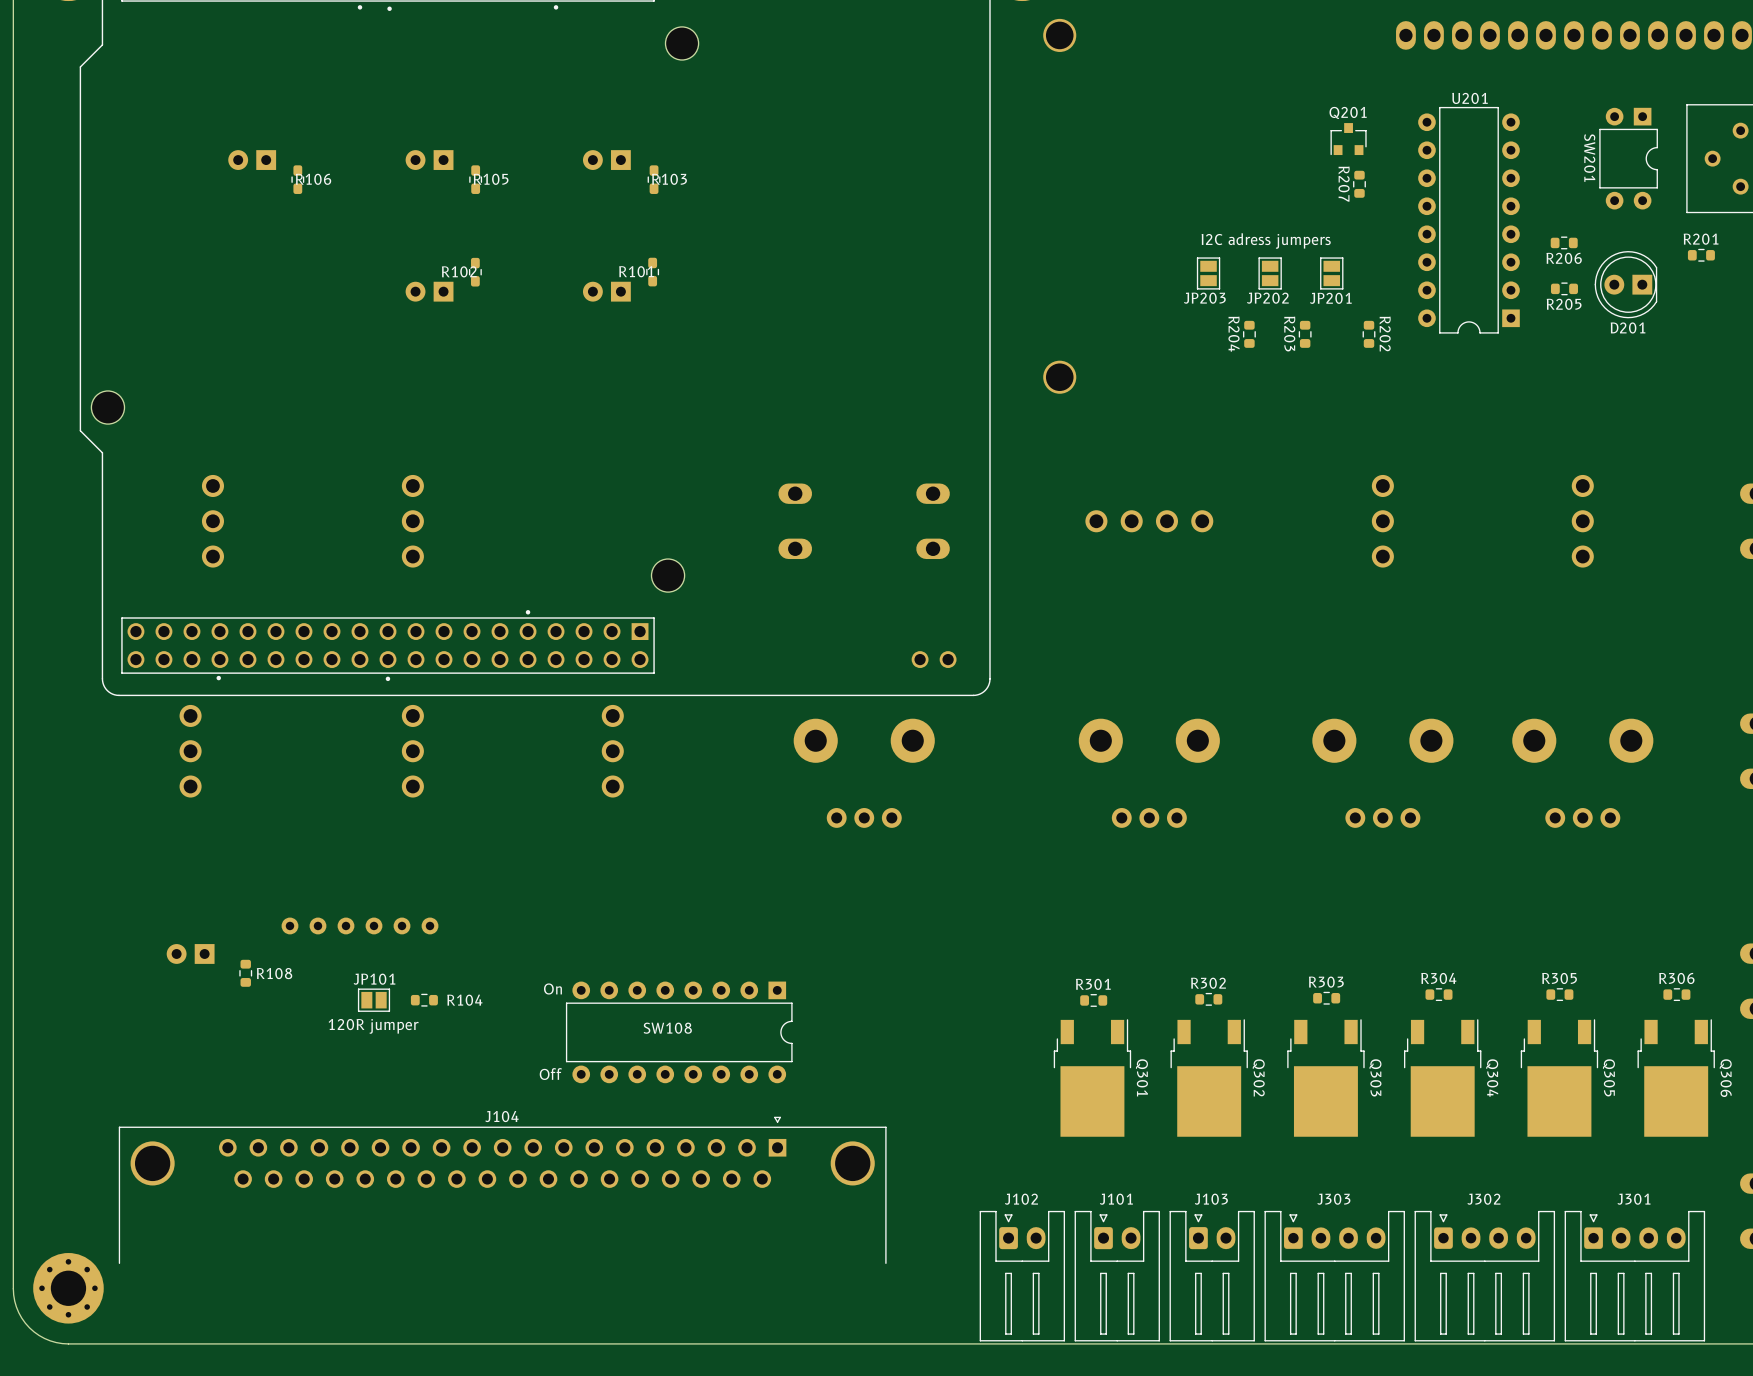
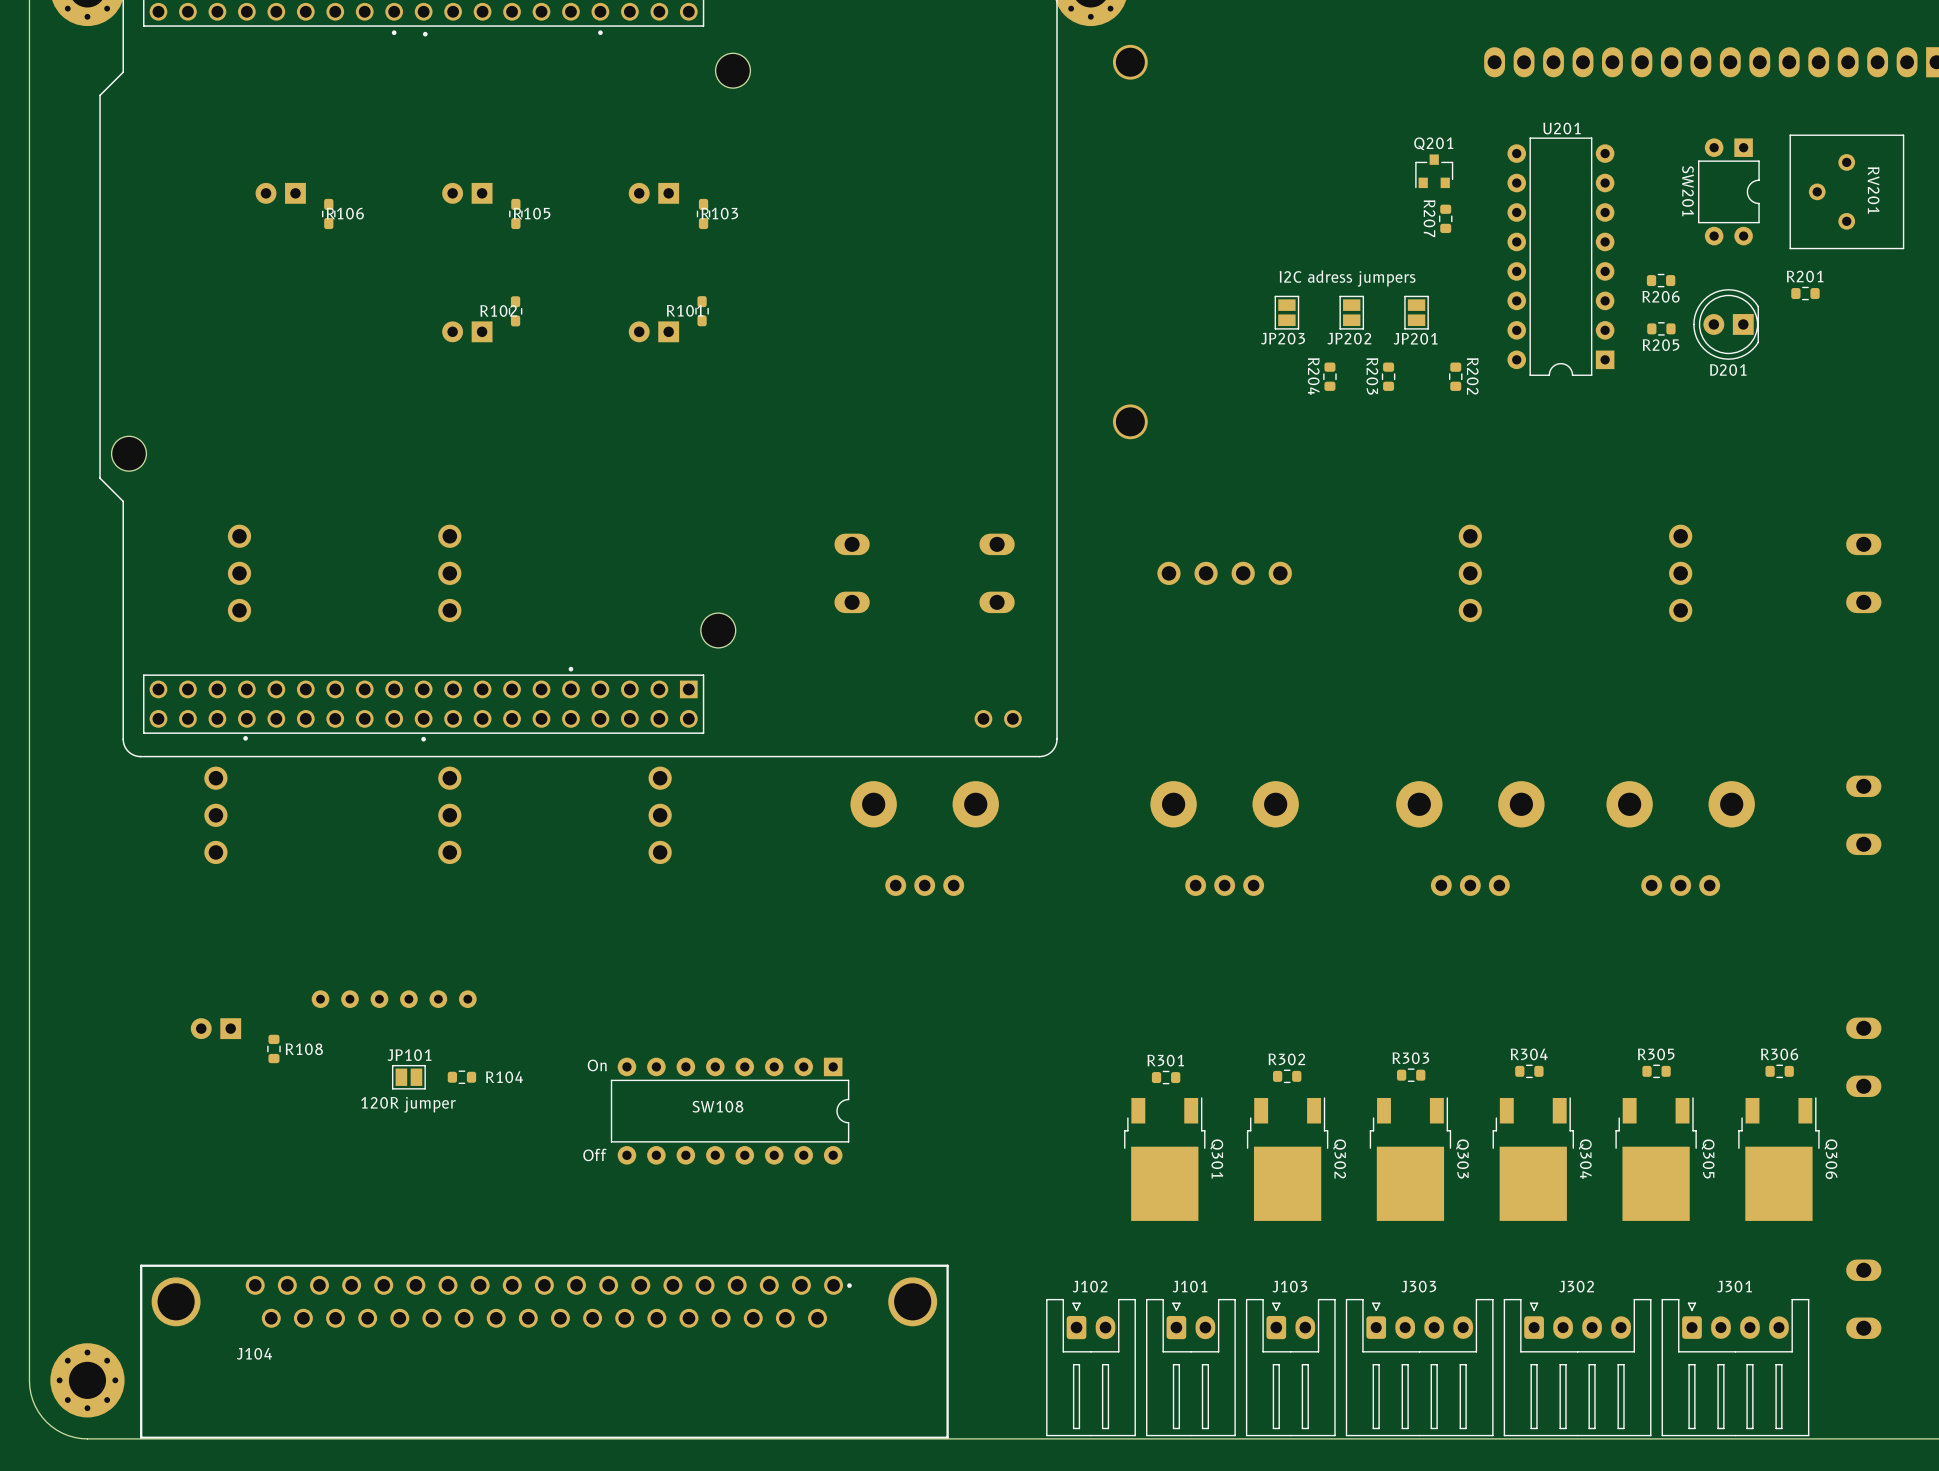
J104 footprint: [118, 1116, 887, 1264] -> [140, 1264, 949, 1439]
J104 name position: J104 (501, 1116) -> J104 (254, 1353)

